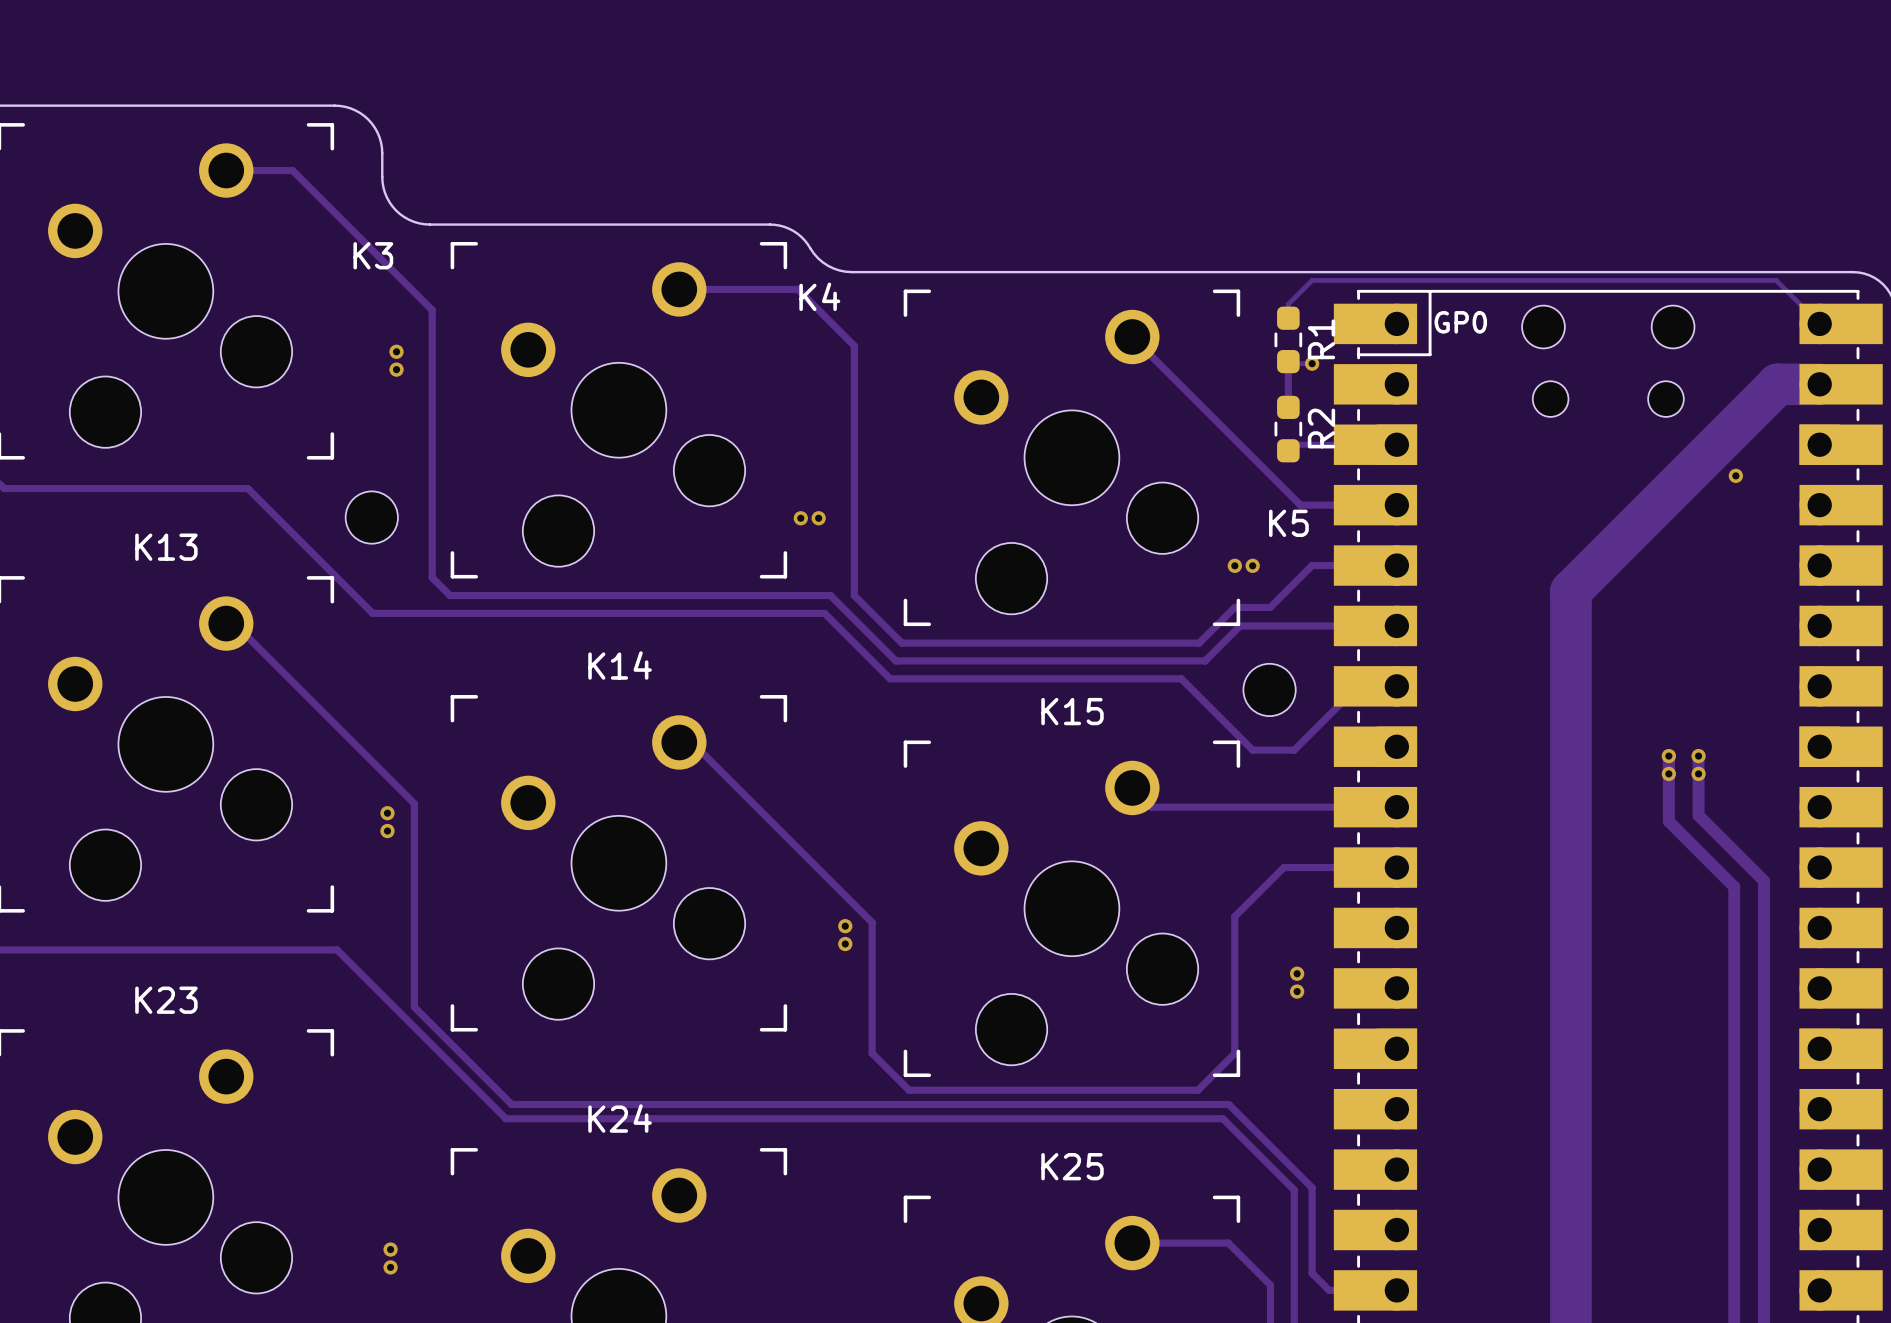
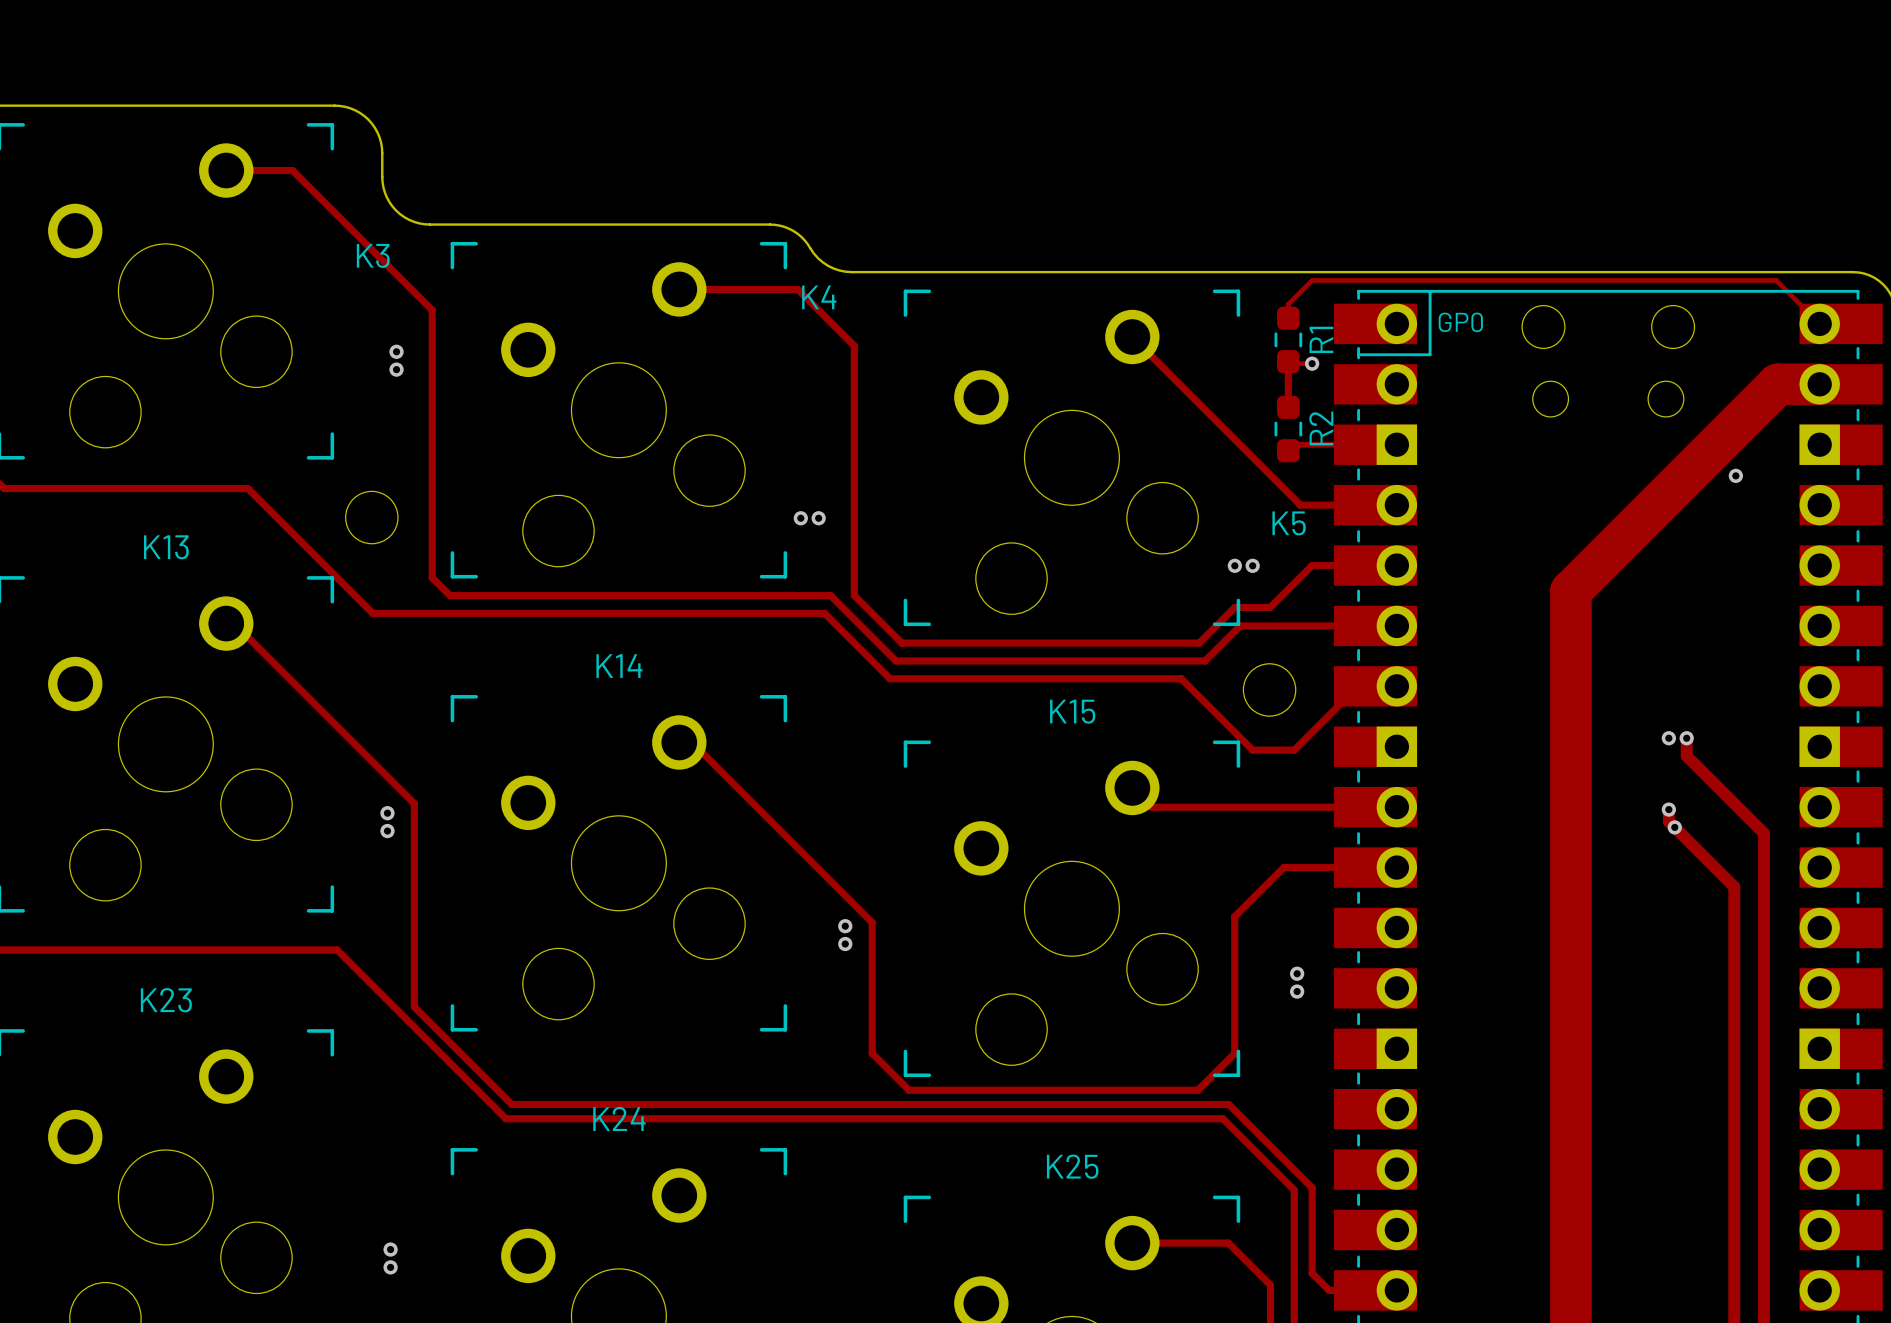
via: none -> (1668, 738)
via: none -> (1686, 738)
track: (1668, 756) (1668, 809) -> none
via: (1668, 756) -> none
track: (1698, 756) (1698, 815) (1763, 880) -> (1686, 738) (1686, 756) (1763, 833) (1763, 880)
via: (1698, 756) -> none
via: (1668, 773) -> none
via: (1698, 773) -> none
via: none -> (1668, 809)
via: none -> (1674, 827)

